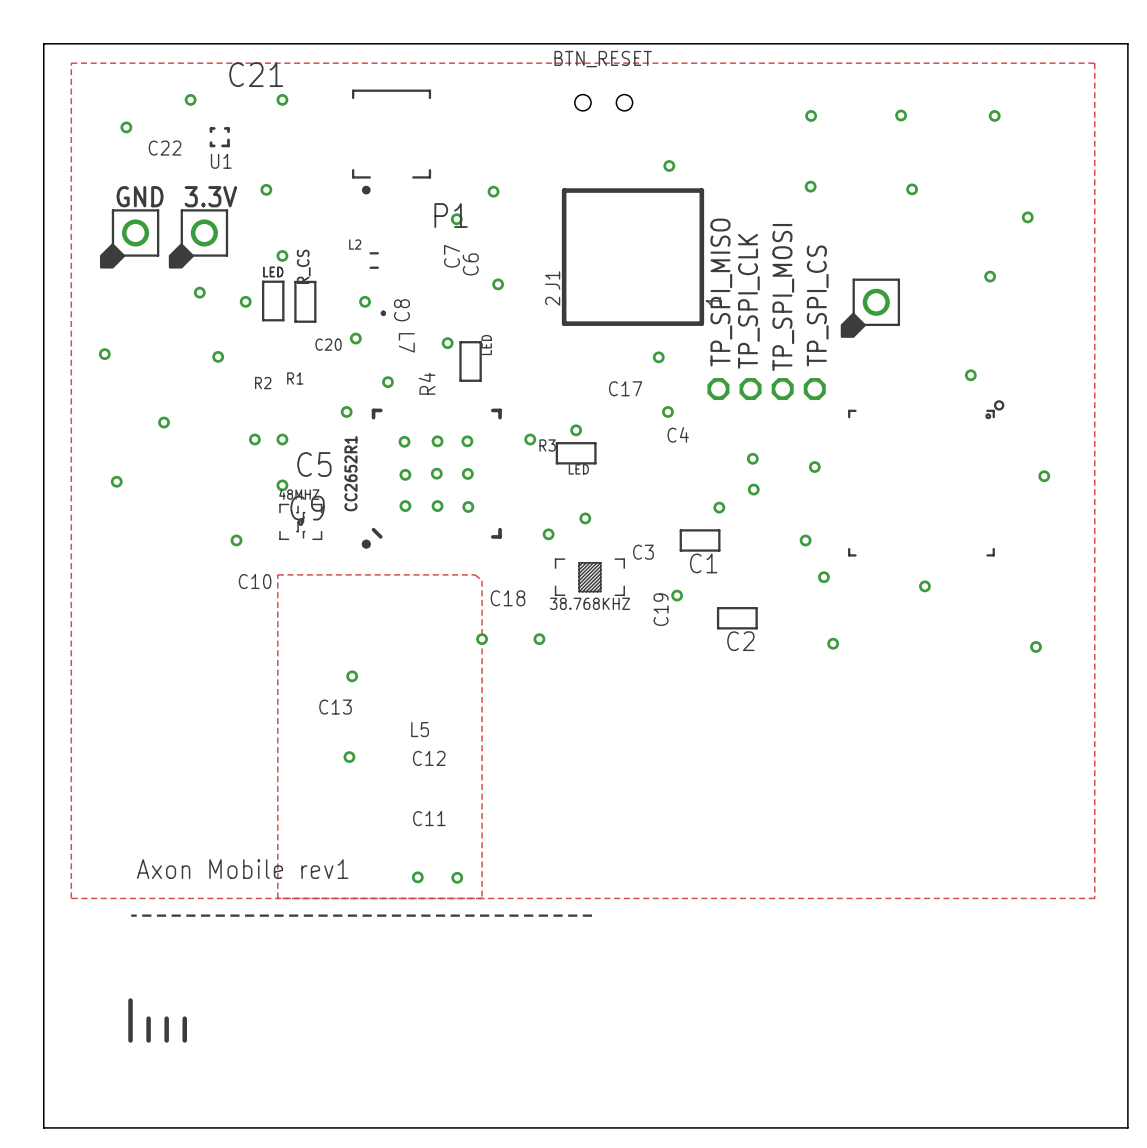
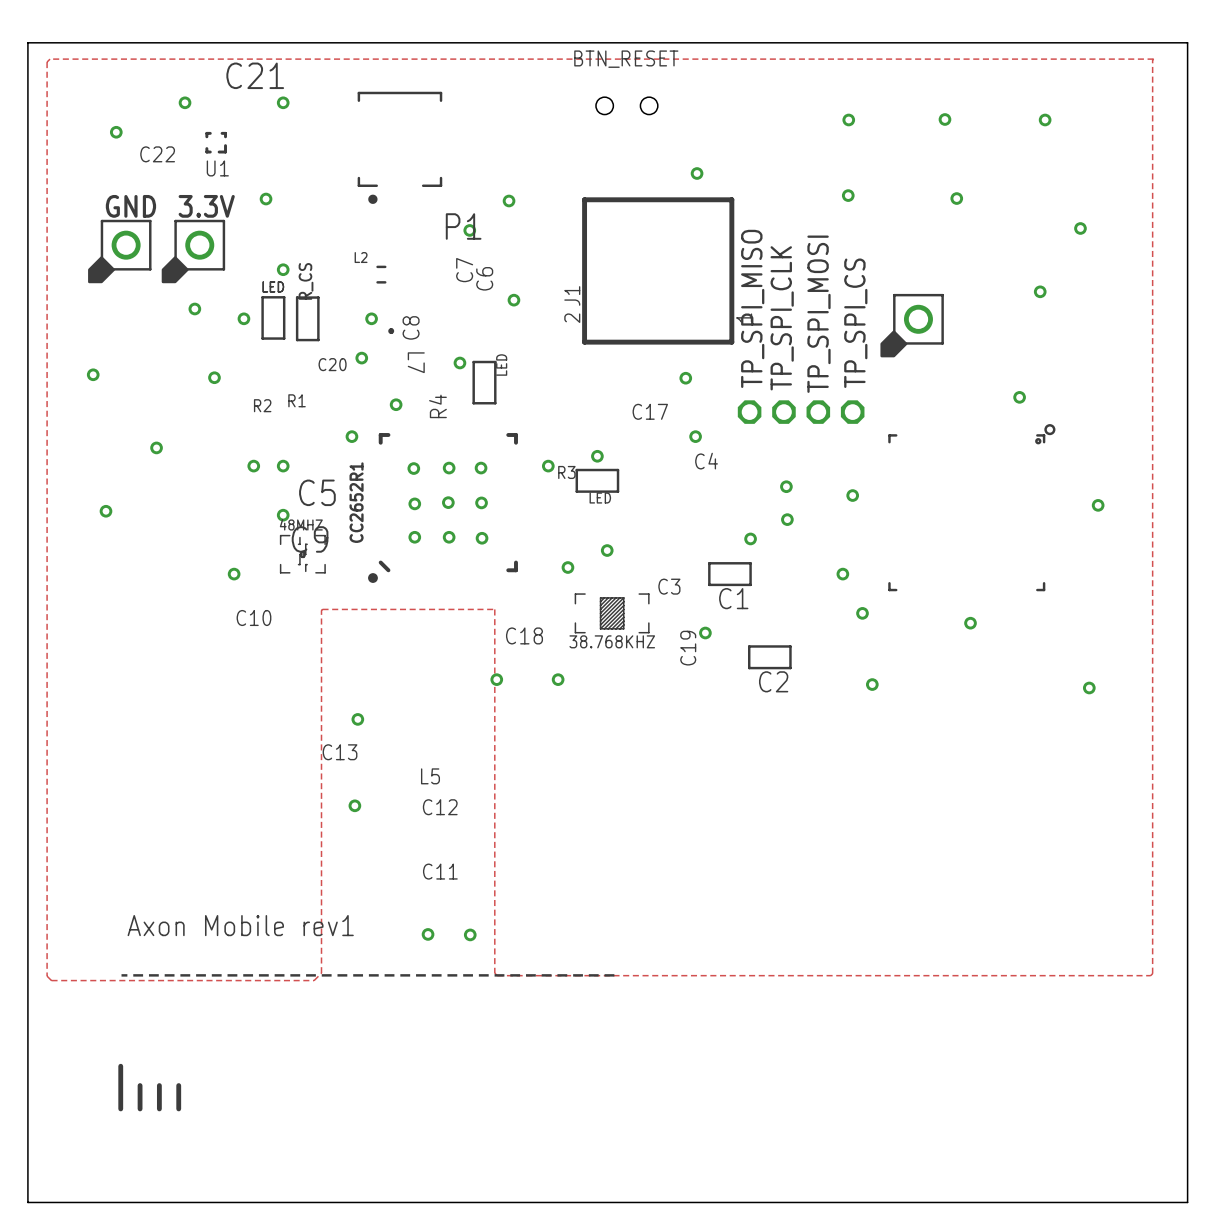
zone outline: (71, 63) (1094, 63) (1094, 898) (71, 898) (71, 63) -> (50, 59) (47, 62) (47, 976) (51, 980) (314, 980) (321, 973) (322, 609) (494, 609) (494, 973) (497, 975) (1150, 975) (1152, 973) (1153, 59) (50, 59)
zone outline: (277, 898) (277, 574) (475, 574) (482, 580) (482, 898) -> none

